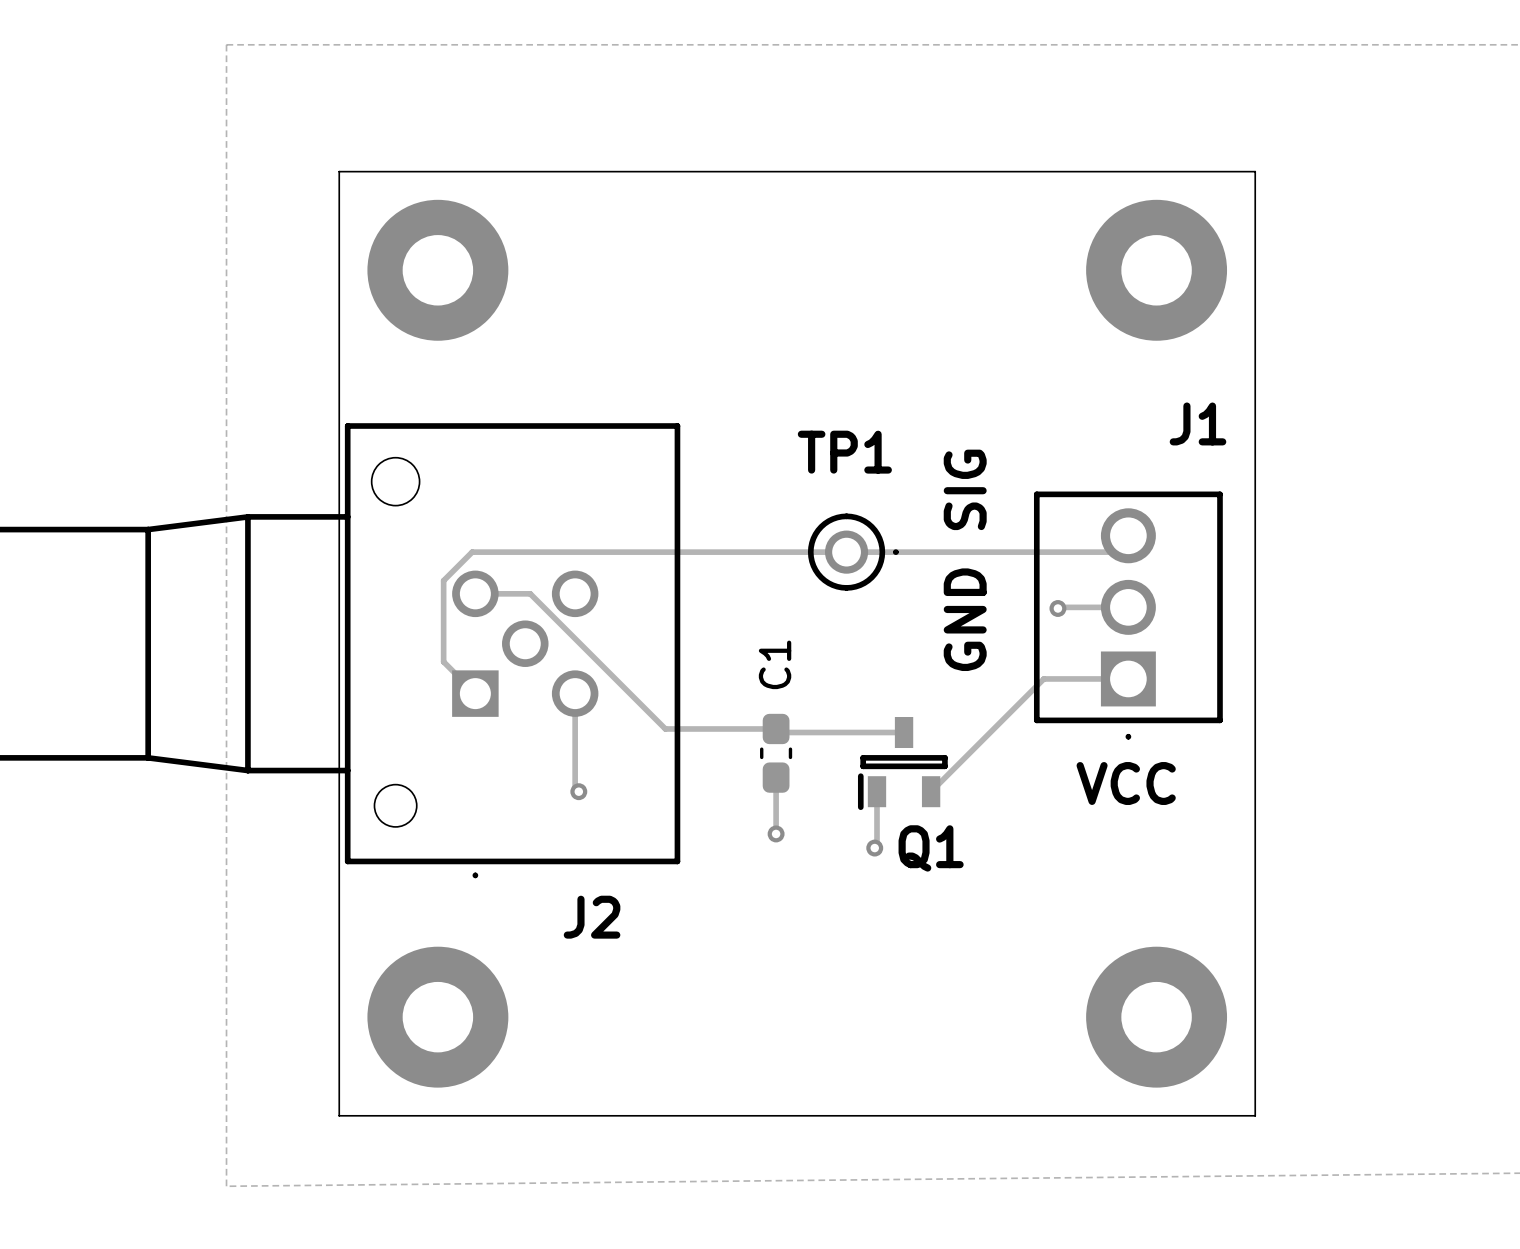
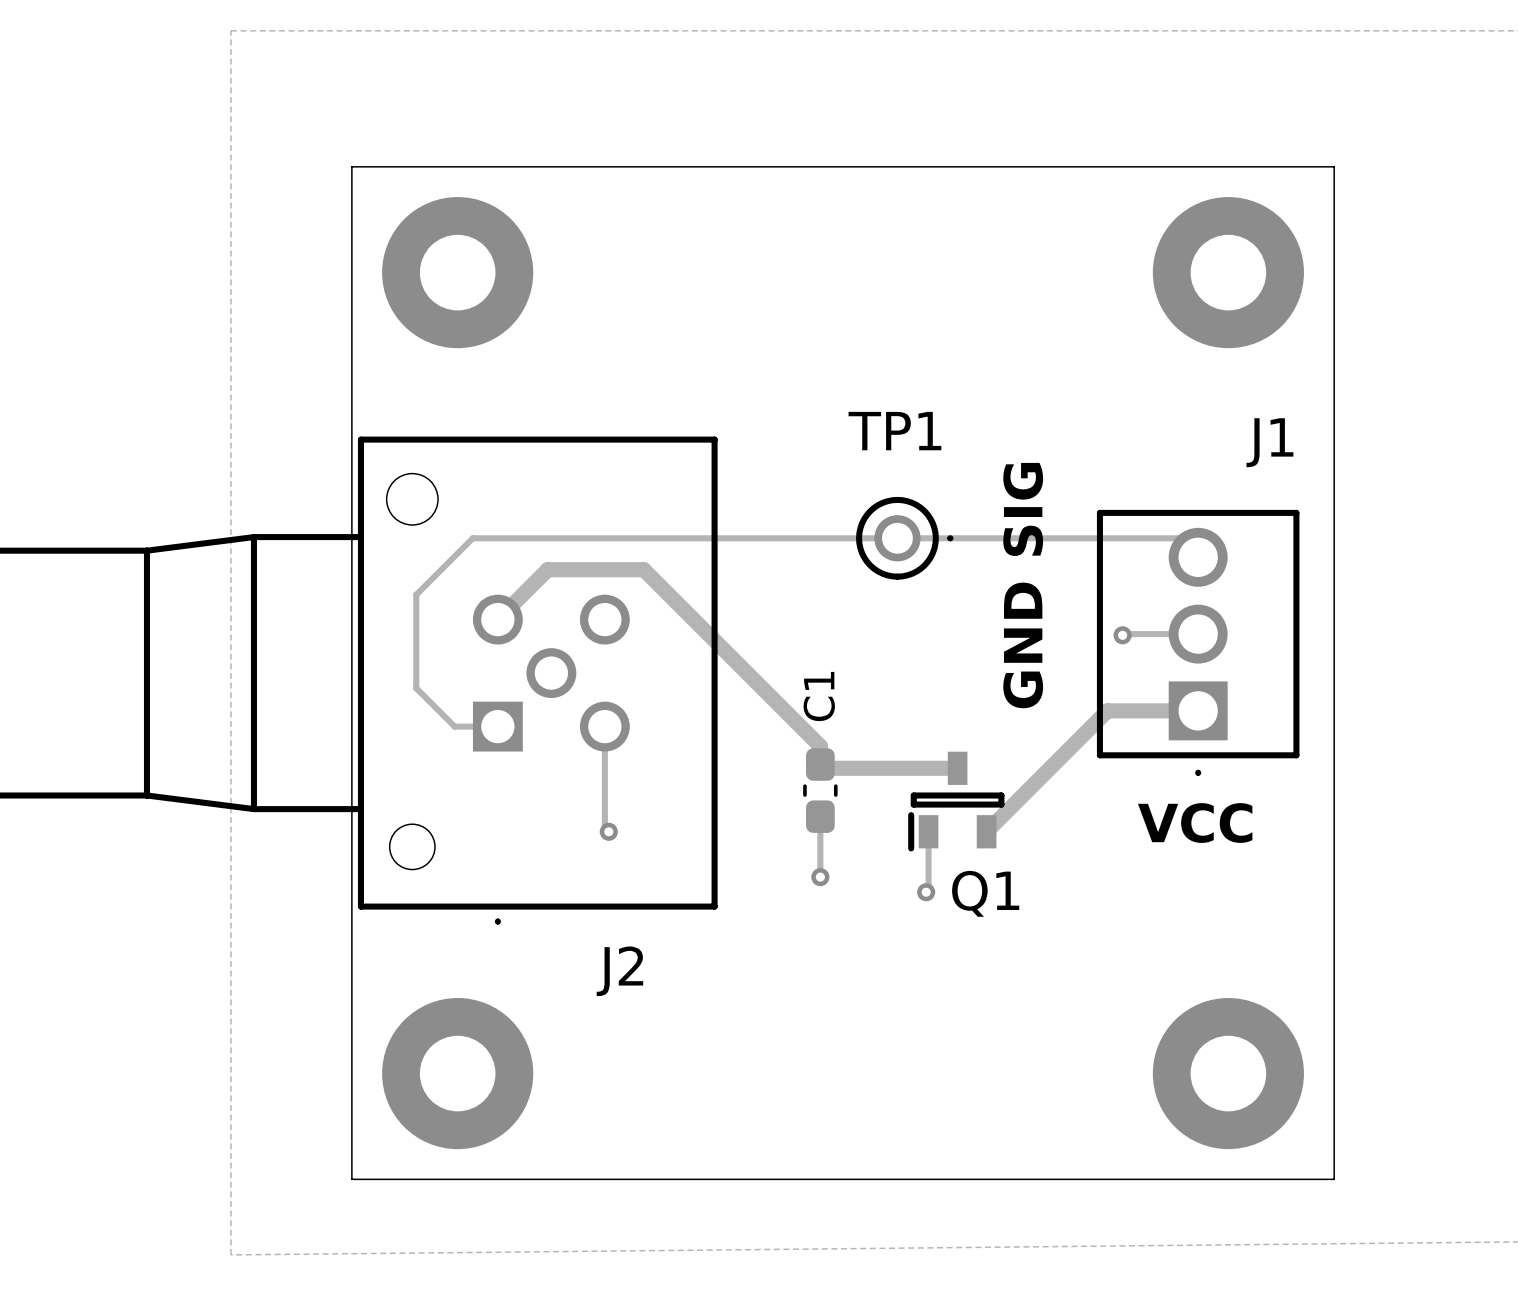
track: (1128, 535) (1112, 552) (472, 552) (443, 580) (443, 661) (475, 693) -> (1198, 557) (1179, 538) (472, 538) (416, 594) (416, 688) (454, 726) (497, 726)
TP1 position: (853, 552) -> (904, 538)
track: (475, 593) (530, 593) (665, 728) (776, 728) -> (497, 619) (547, 569) (643, 569) (820, 746) (820, 764)
track width: thin (1128, 678) (1043, 678) (931, 791) -> thick (1198, 710) (1107, 710) (986, 831)
track width: thin (776, 728) (779, 732) (904, 732) -> thick (820, 764) (824, 768) (957, 768)

